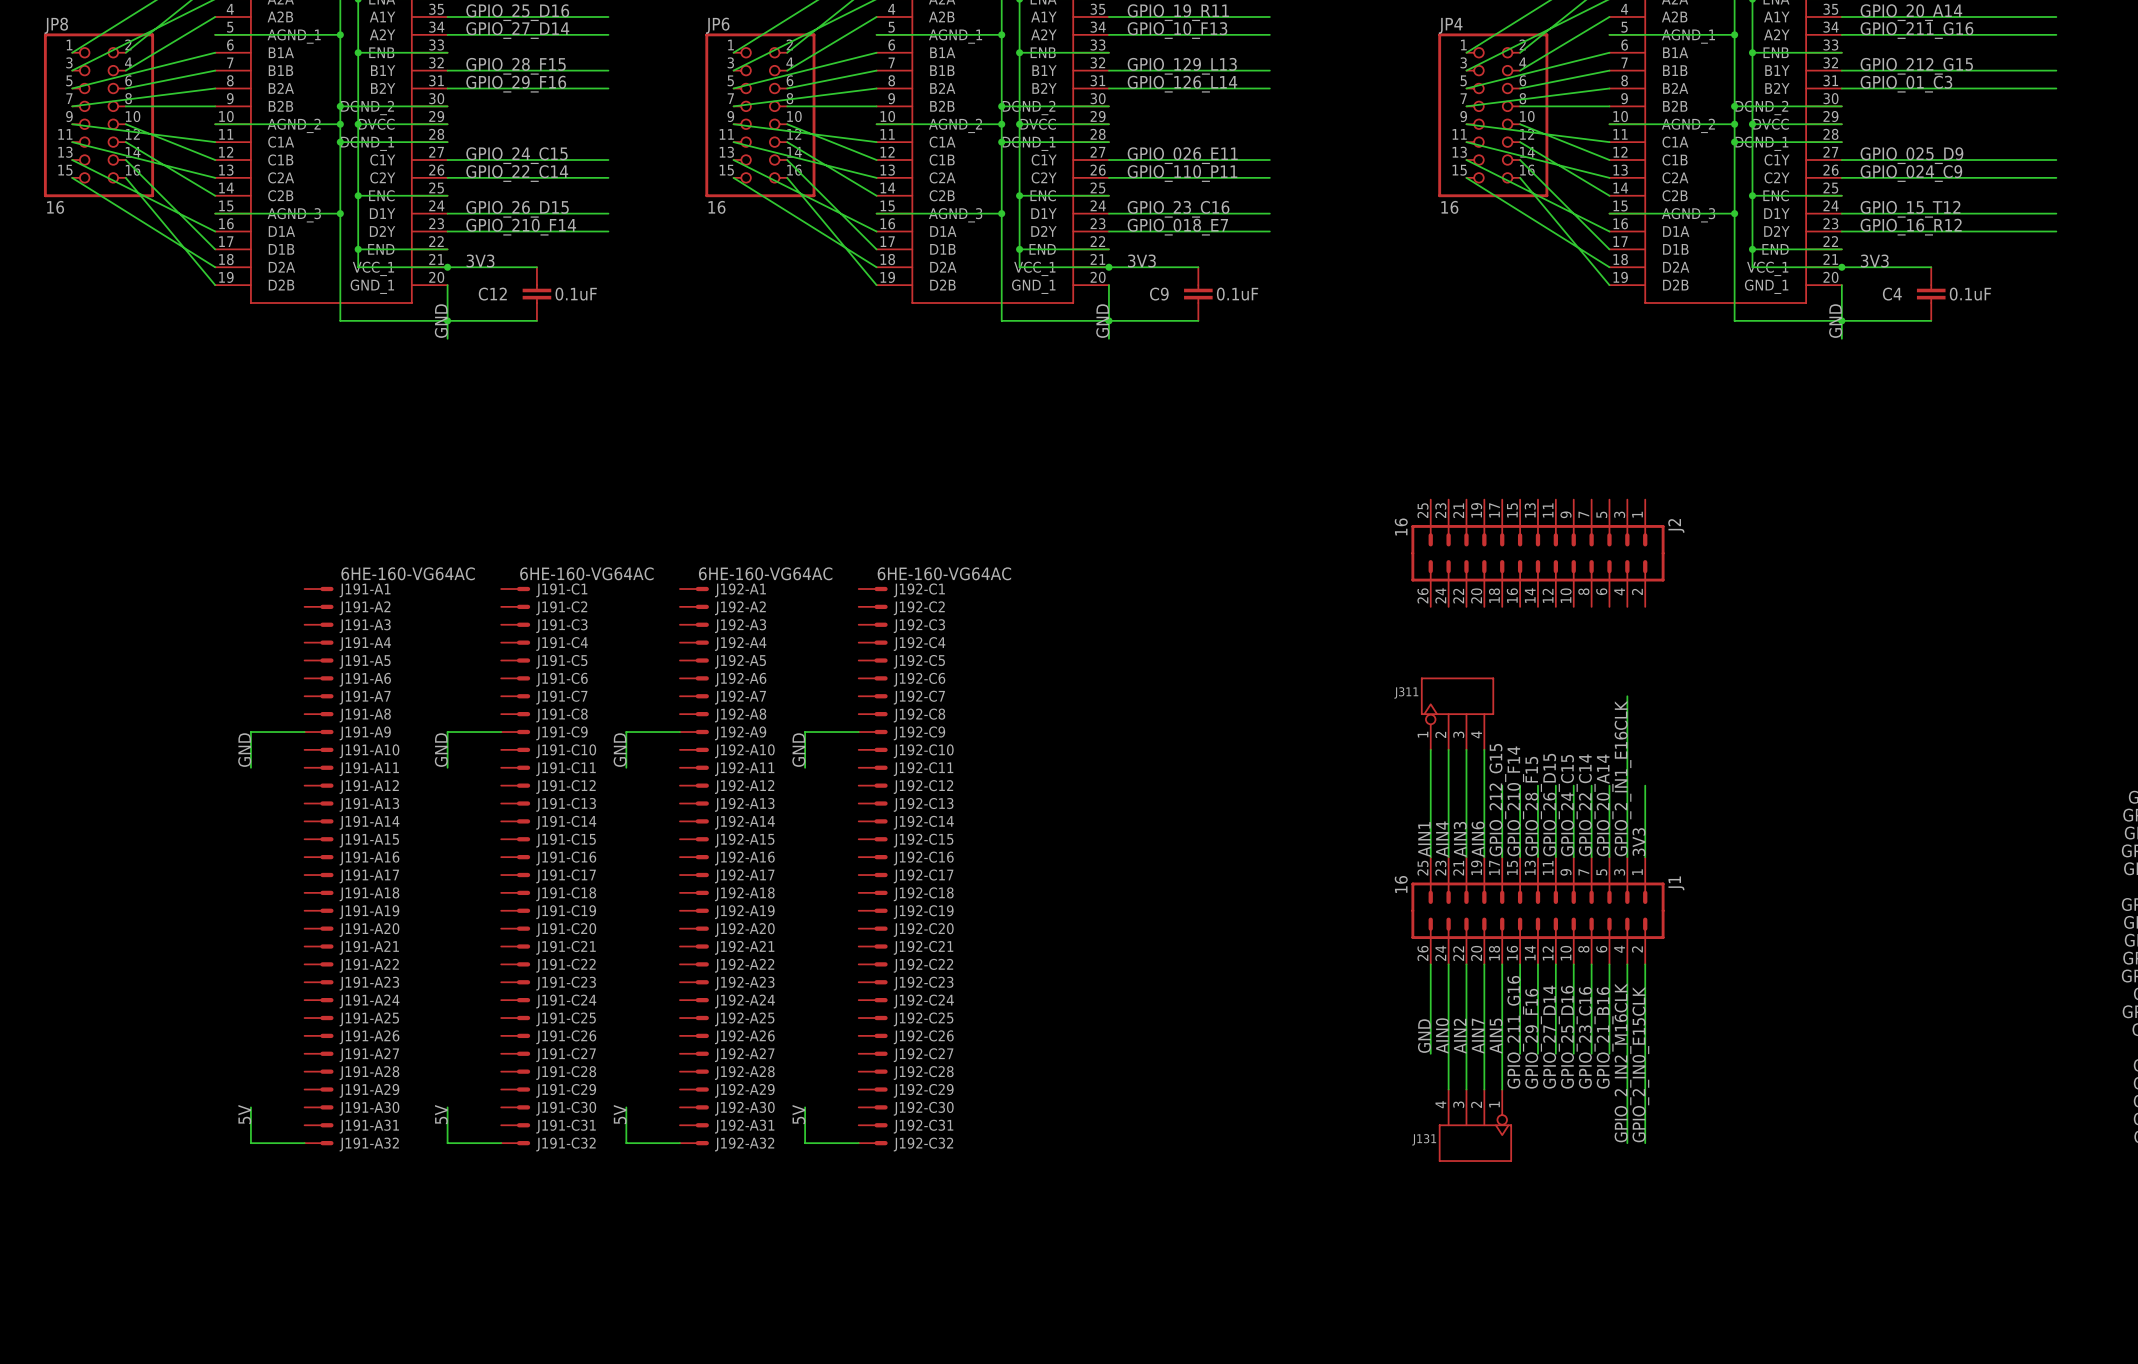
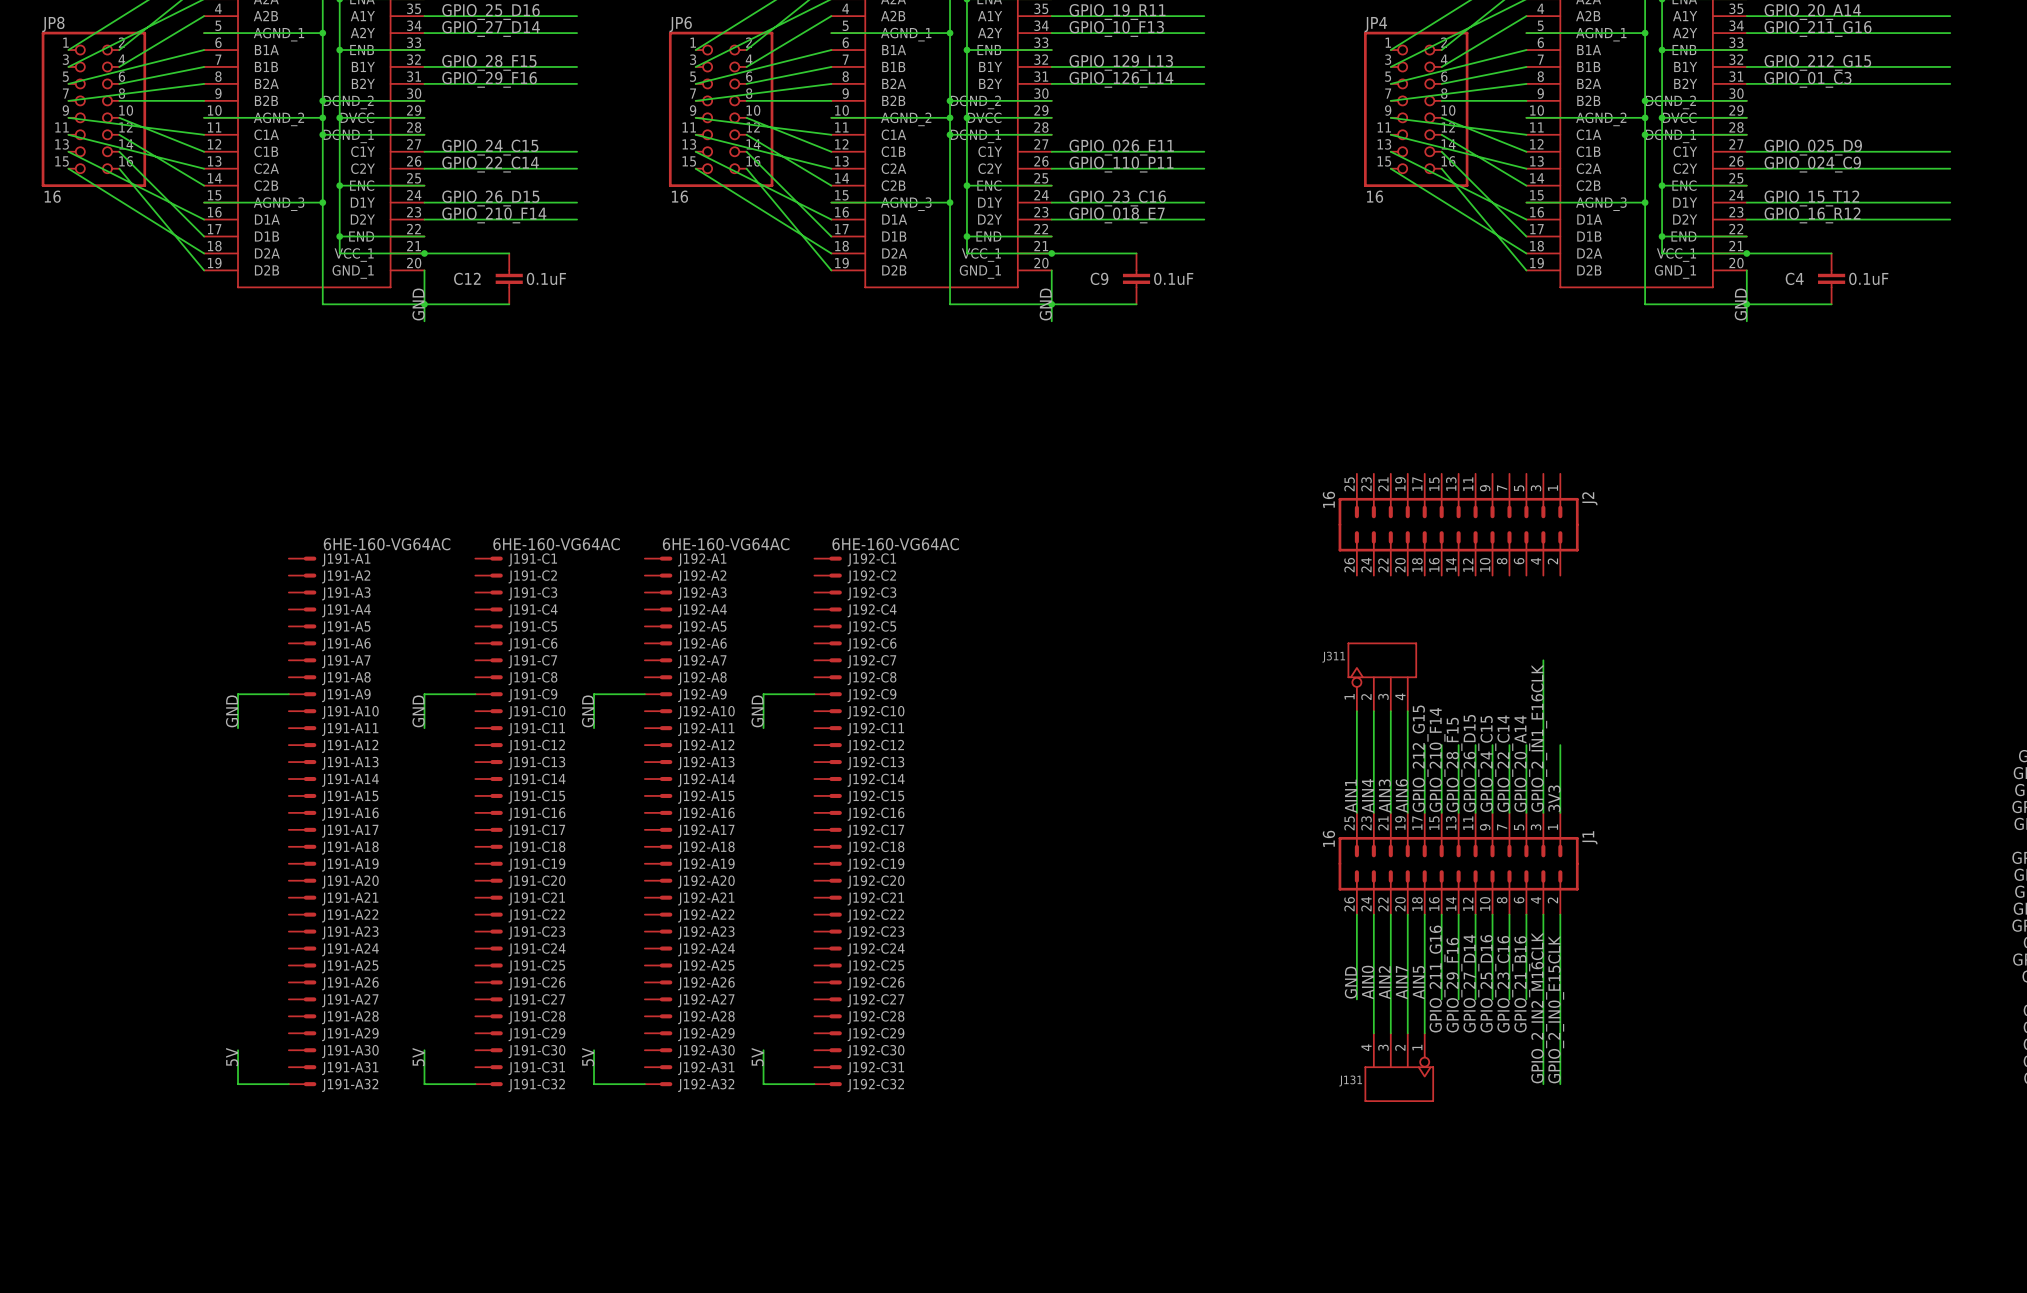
label: 3V3 (480, 261) -> none
label: 3V3 (1141, 261) -> none
label: 3V3 (1874, 261) -> none

